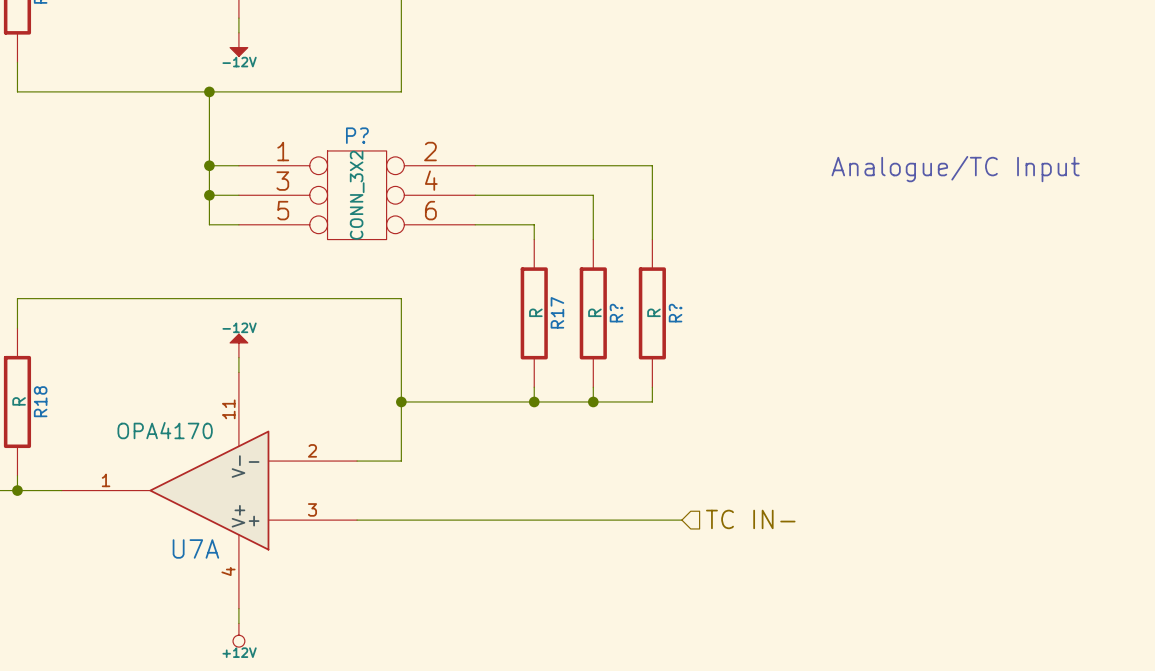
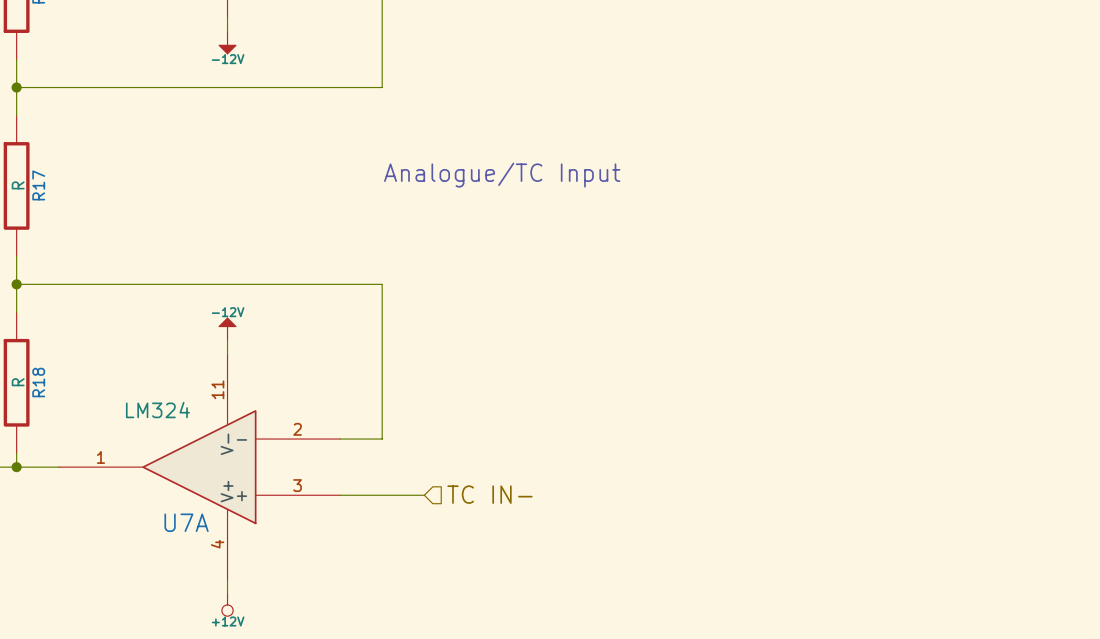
wire: none -> (16, 87) (16, 115)
junction: none -> (16, 87)
wire: (209, 91) (209, 224) (238, 224) -> none
junction: (209, 91) -> none
wire: (209, 165) (238, 165) -> none
junction: (209, 165) -> none
wire: (475, 165) (652, 165) (652, 239) -> none
text: Analogue/TC Input (955, 169) -> none
text: none -> Analogue/TC Input (502, 175)
wire: (209, 195) (238, 195) -> none
junction: (209, 195) -> none
P?: CONN_3X2 (357, 195) -> none
wire: (475, 195) (593, 195) (593, 239) -> none
wire: (475, 224) (534, 224) (534, 239) -> none
wire: none -> (16, 256) (16, 284)
junction: none -> (16, 284)
R17 position: (534, 313) -> (16, 185)
R?: R (593, 313) -> none
R?: R (652, 313) -> none
wire: (534, 387) (534, 401) -> none
wire: (593, 387) (593, 401) -> none
wire: (652, 387) (652, 401) (401, 401) -> none
junction: (401, 401) -> none
junction: (534, 401) -> none
junction: (593, 401) -> none
U7A value: OPA4170 (165, 430) -> LM324 (157, 410)
hierarchical label position: TC IN- (750, 519) -> TC IN- (489, 494)
wire: (445, 520) (681, 520) -> none

